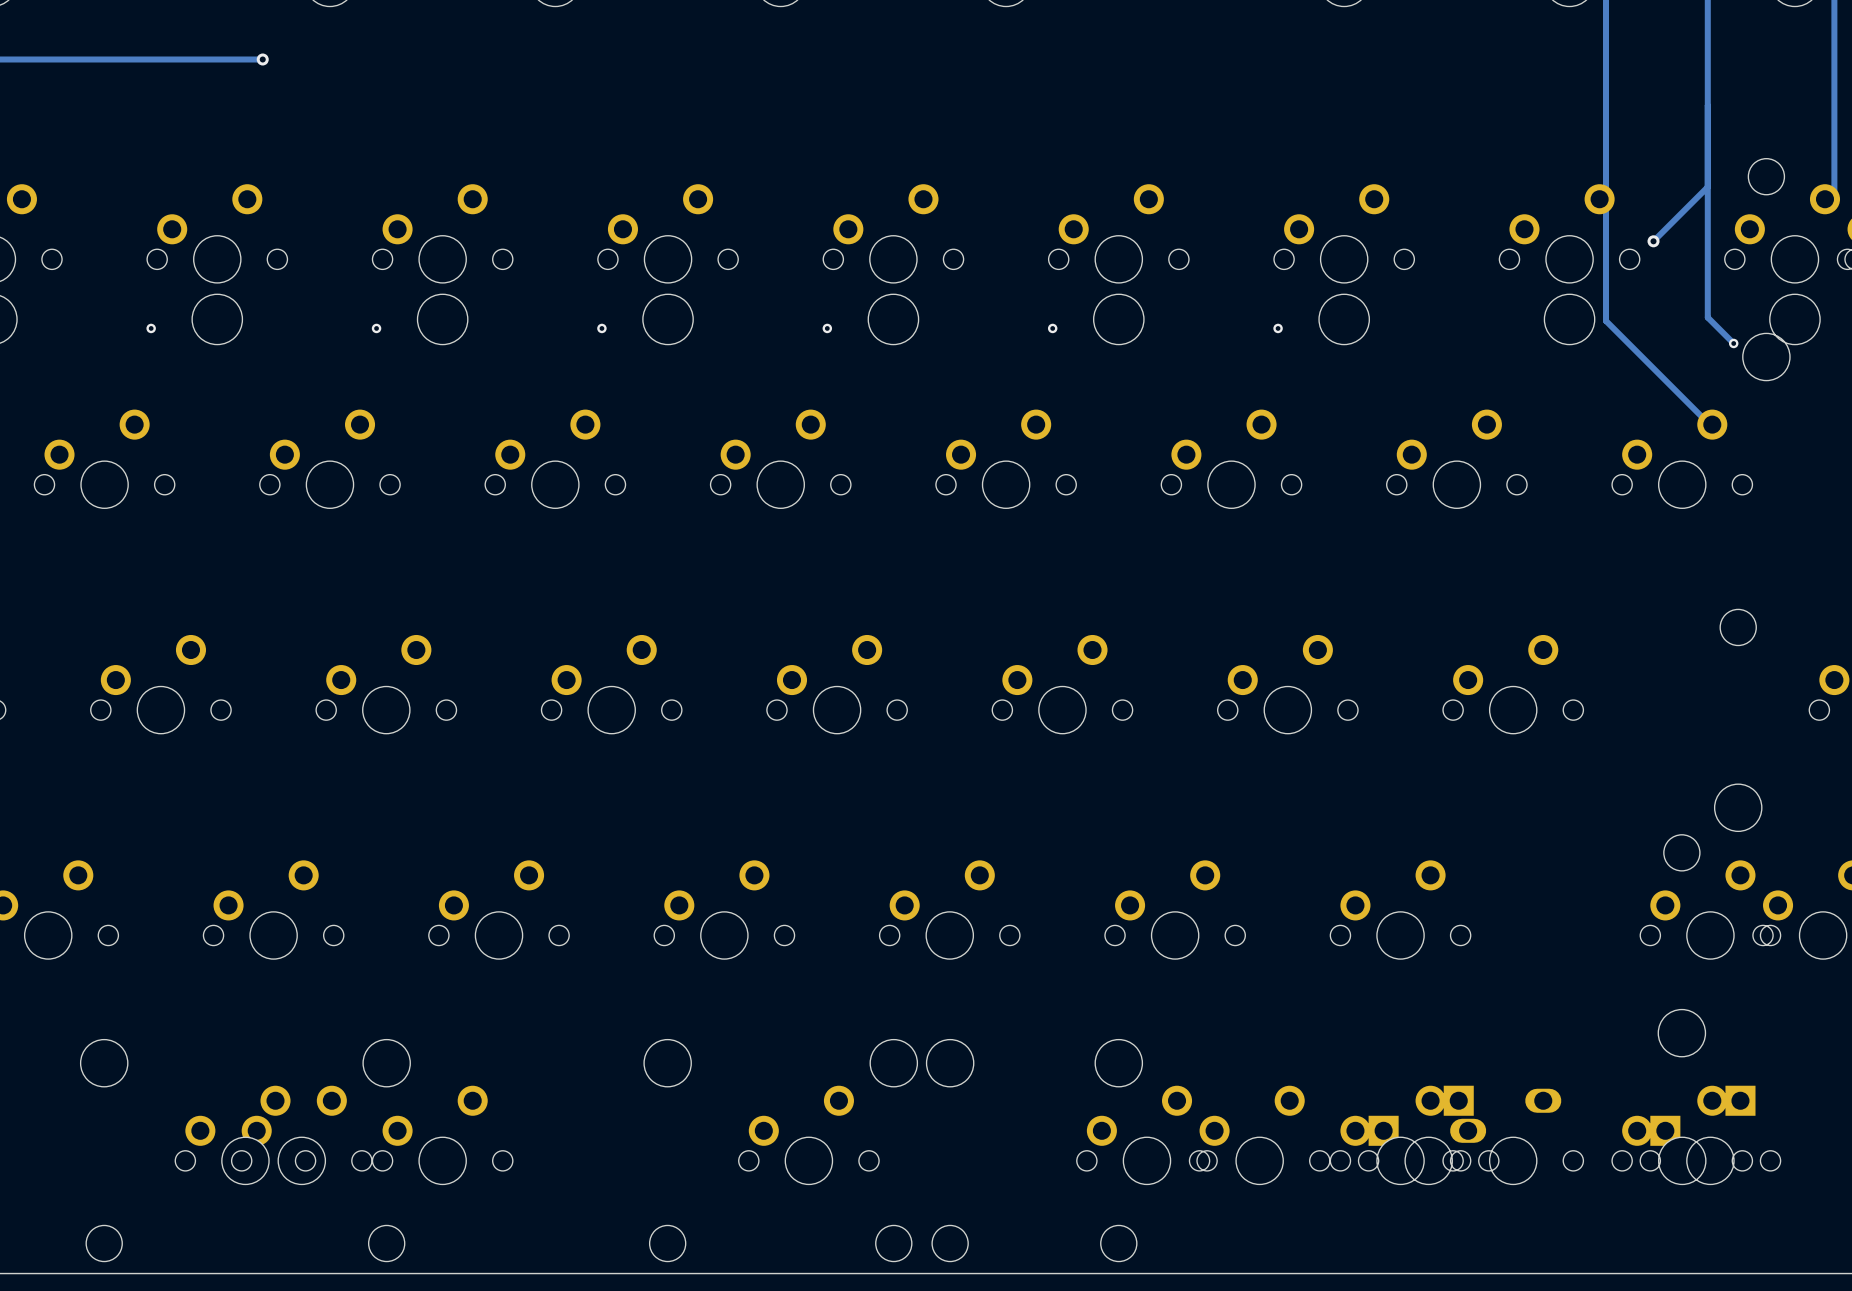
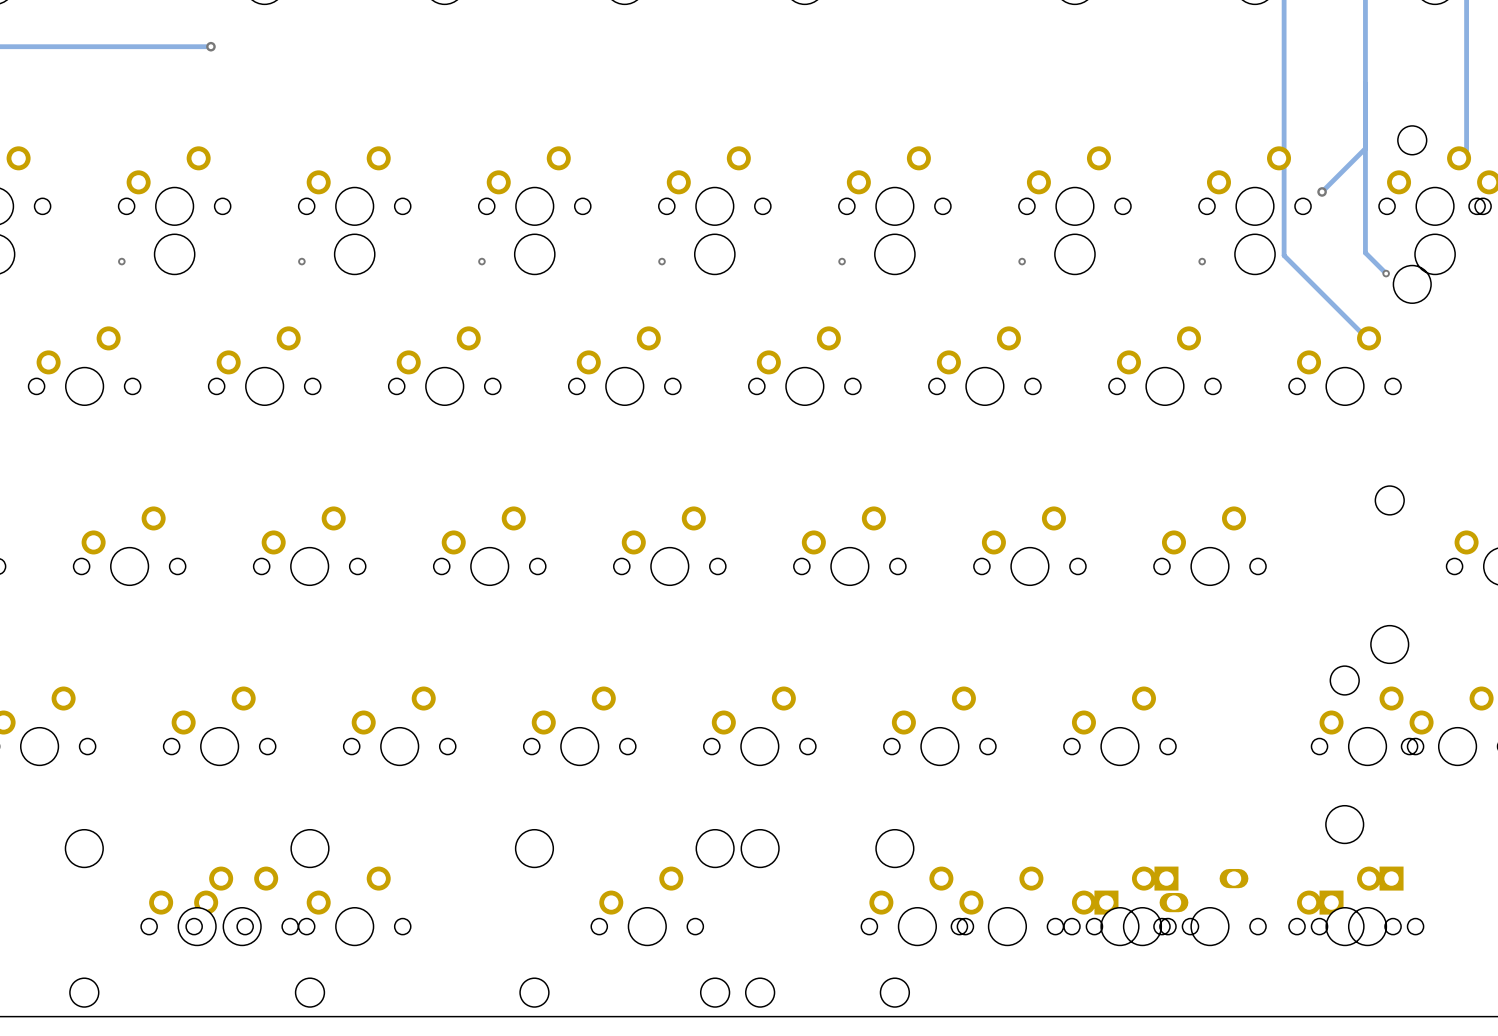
via: none -> (1202, 261)

